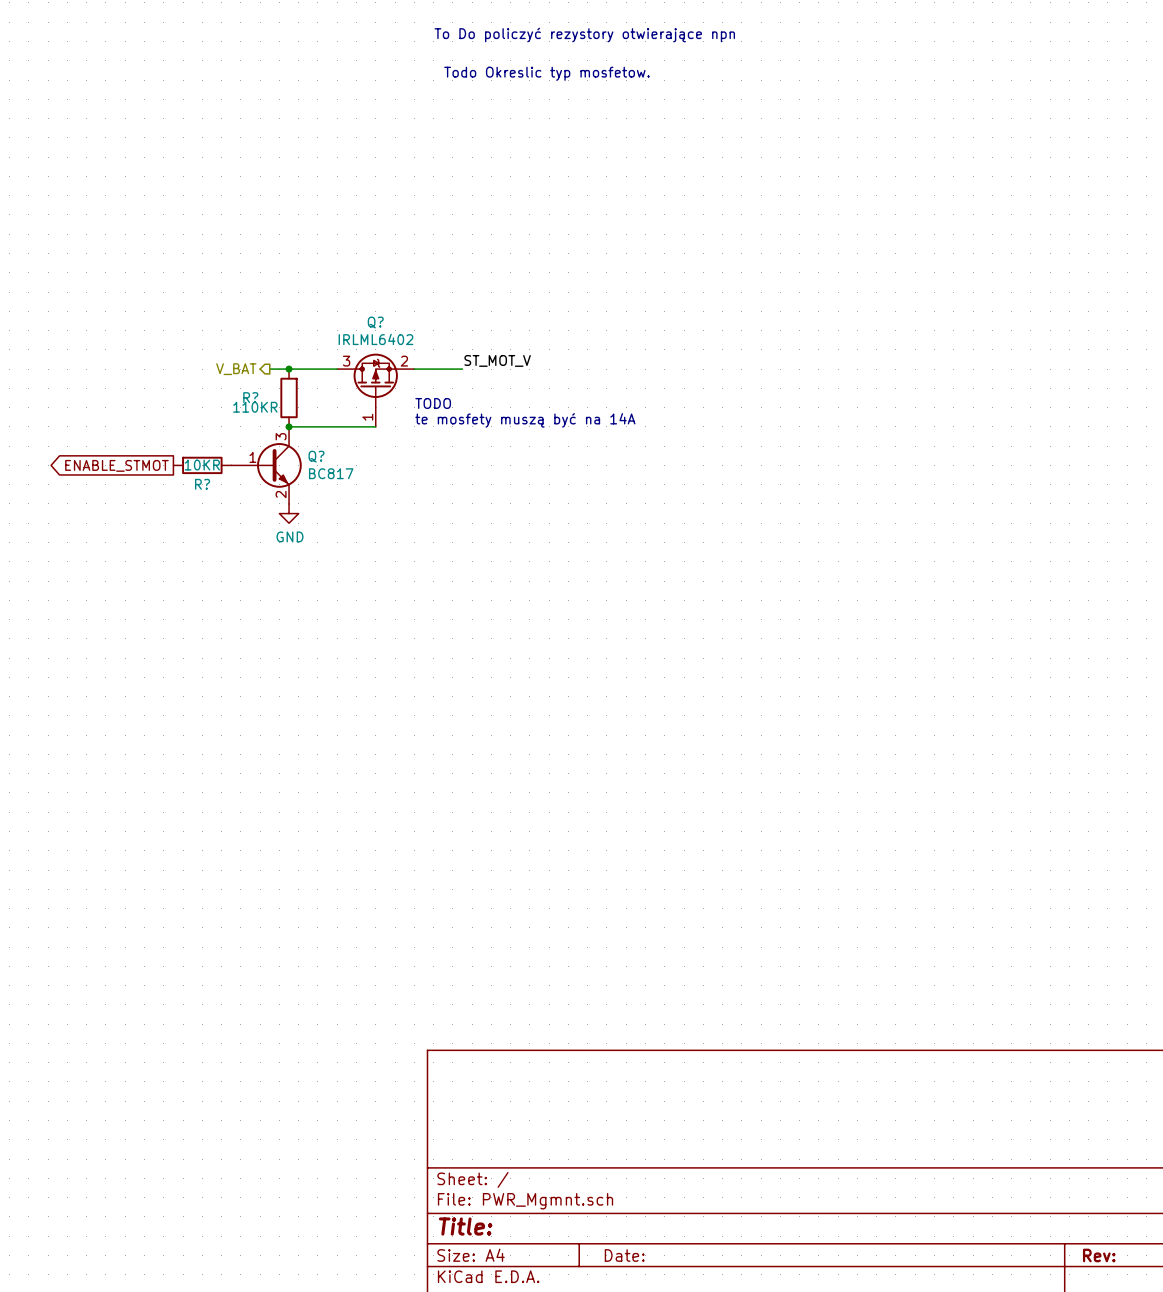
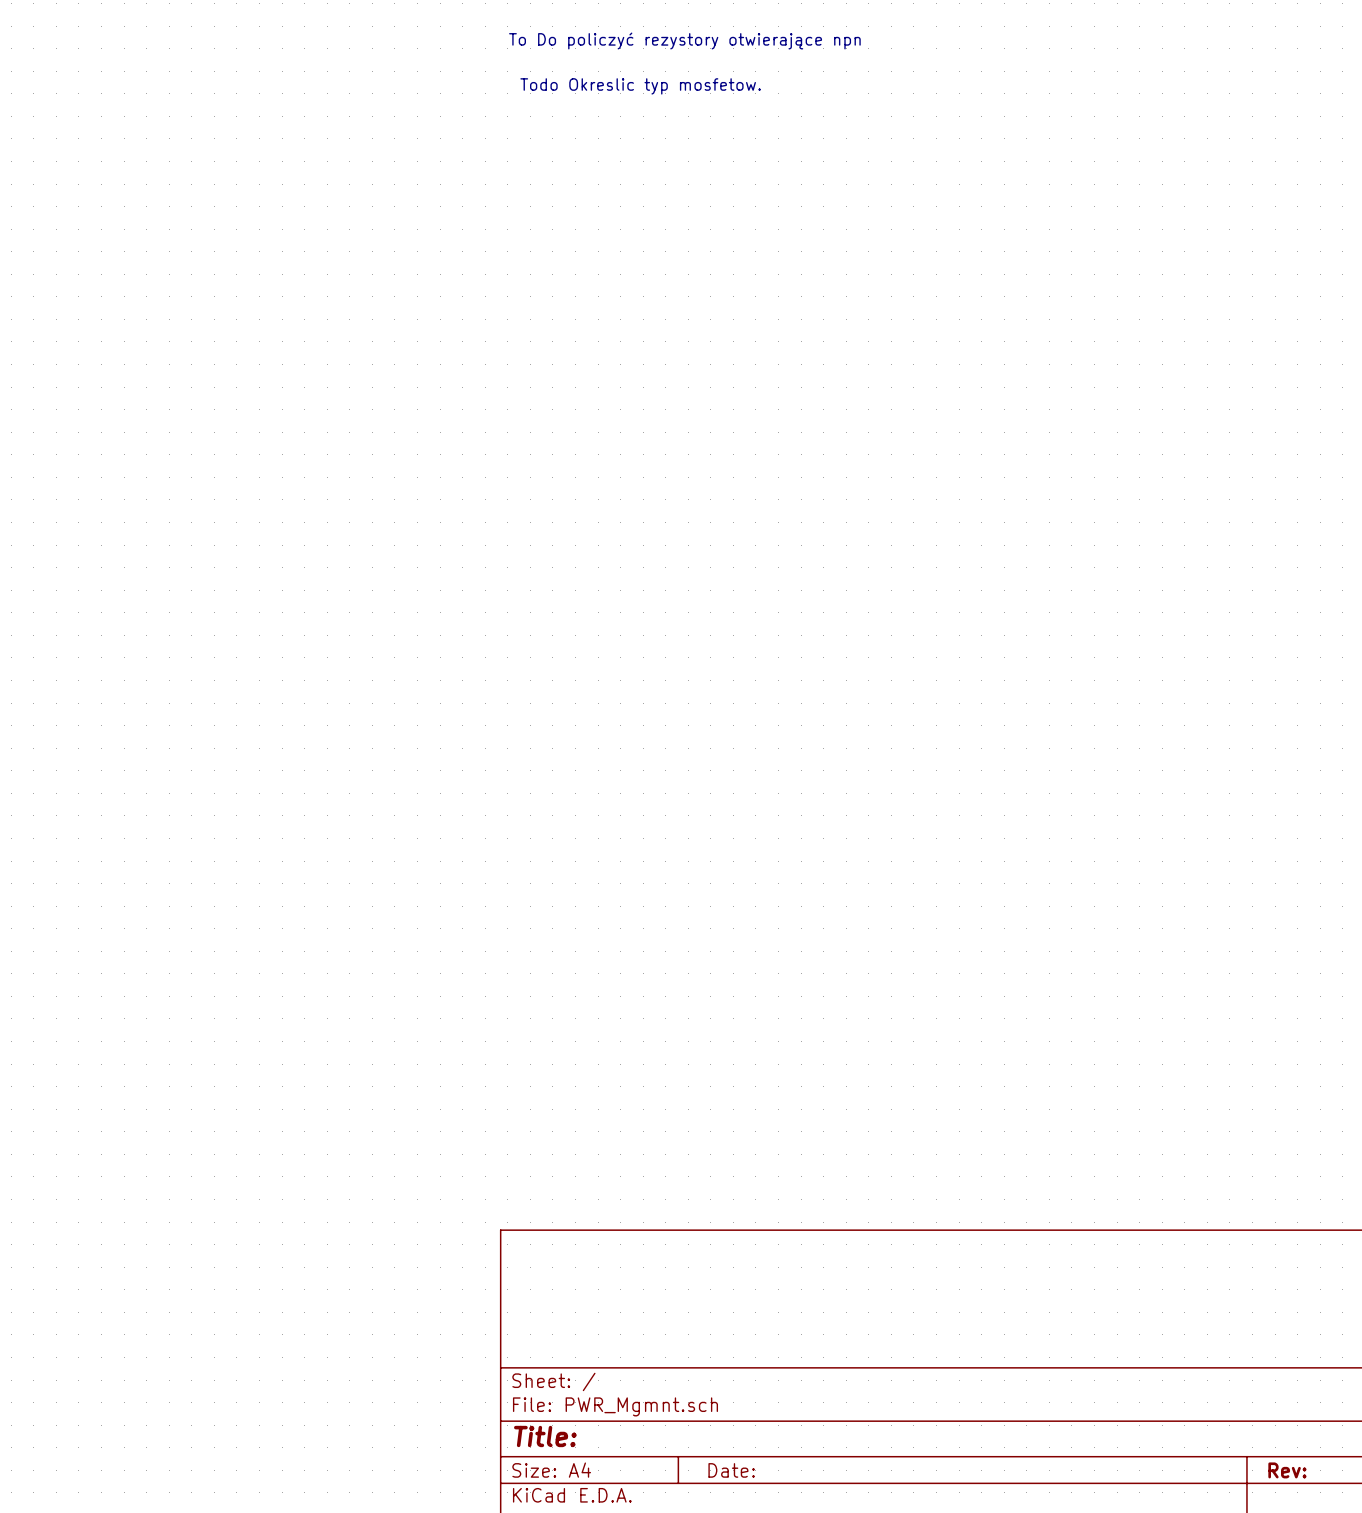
label: ST_MOT_V (497, 360) -> none
hierarchical label: V_BAT (236, 369) -> none
wire: (269, 369) (337, 369) -> none
junction: (289, 369) -> none
wire: (414, 369) (462, 369) -> none
Q?: IRLML6402 (375, 390) -> none
R?: 110KR (289, 397) -> none
text: TODO (433, 403) -> none
text: te mosfety muszą być na 14A (525, 420) -> none
wire: (289, 426) (375, 426) -> none
junction: (289, 426) -> none
global label: ENABLE_STMOT (116, 465) -> none
R?: 10KR (202, 465) -> none
Q?: BC817 (266, 465) -> none
power symbol: GND (289, 513) -> none

